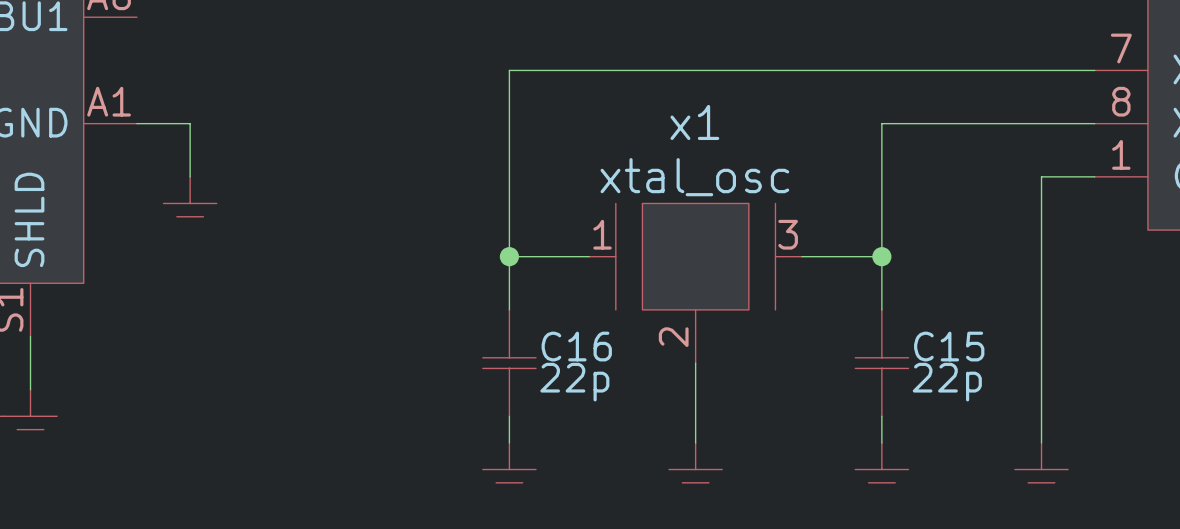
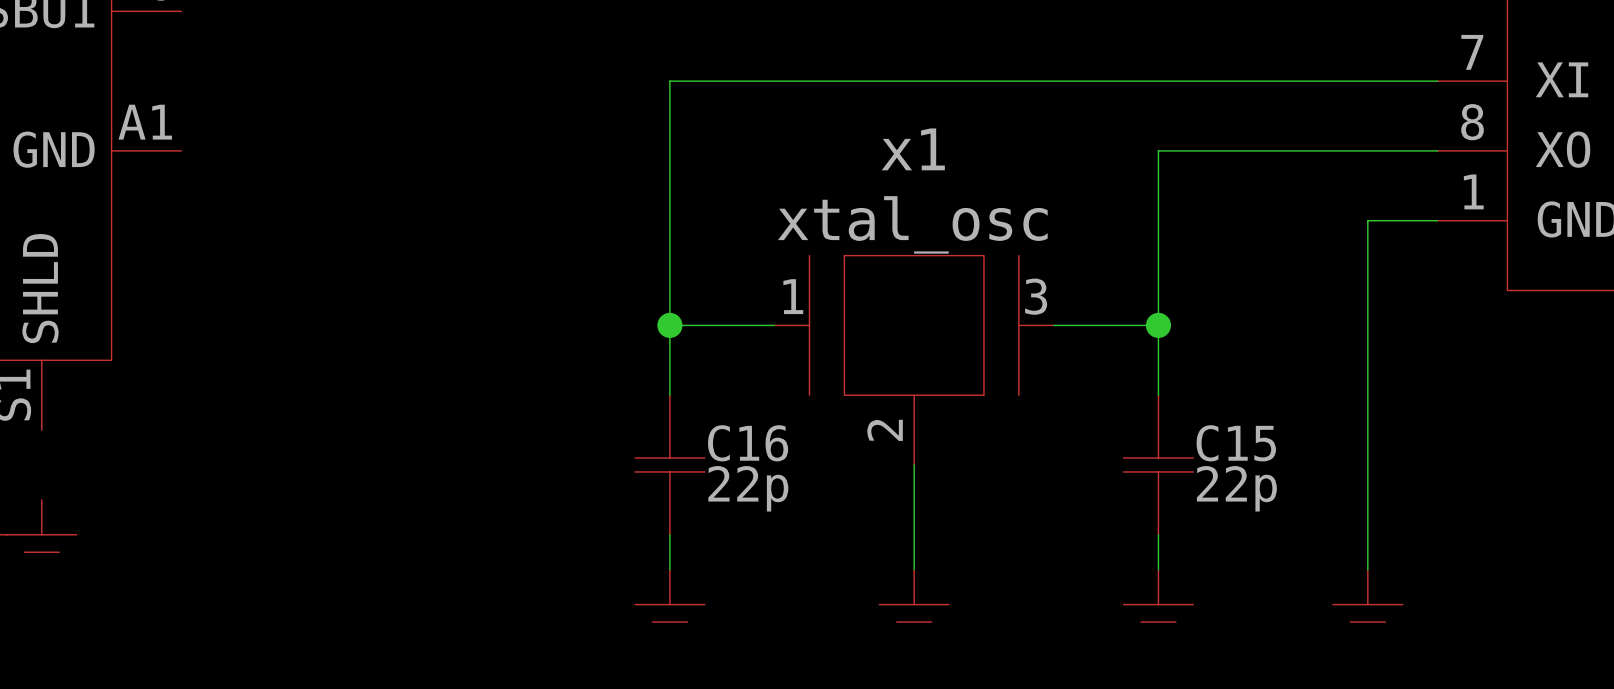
wire: (136, 123) (190, 123) (190, 176) -> none
power symbol: (190, 203) -> none
wire: (30, 336) (30, 389) -> none

